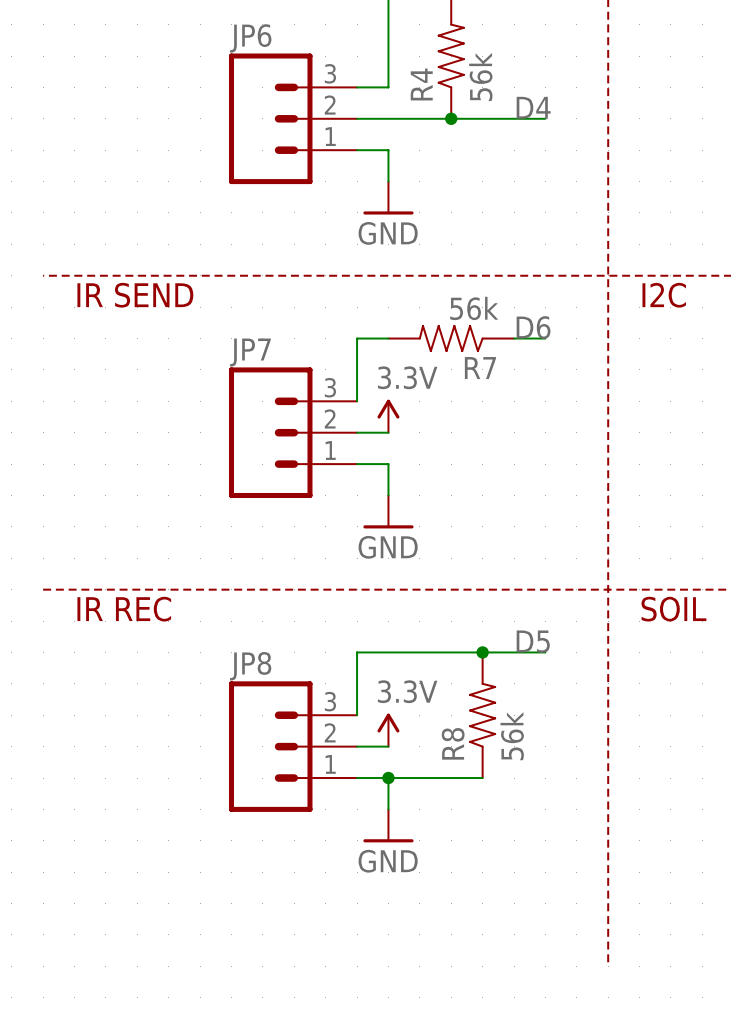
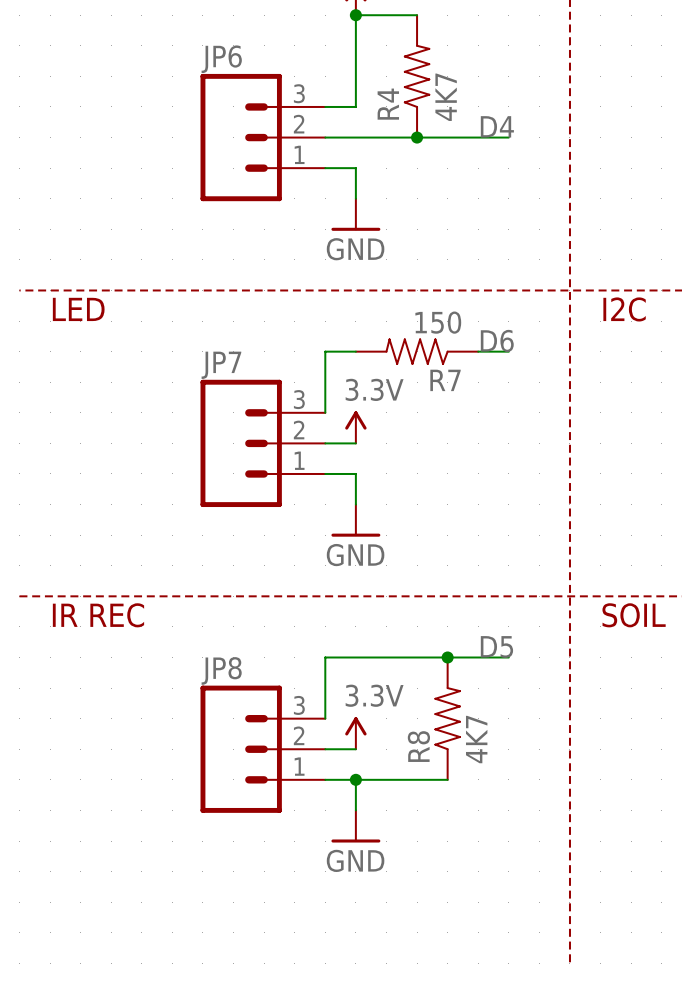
R4 value: 56k (480, 76) -> 4K7 (446, 97)
text: IR SEND (135, 295) -> LED (78, 309)
R7 value: 56k (474, 308) -> 150 (438, 322)
R8 value: 56k (512, 736) -> 4K7 (476, 739)

